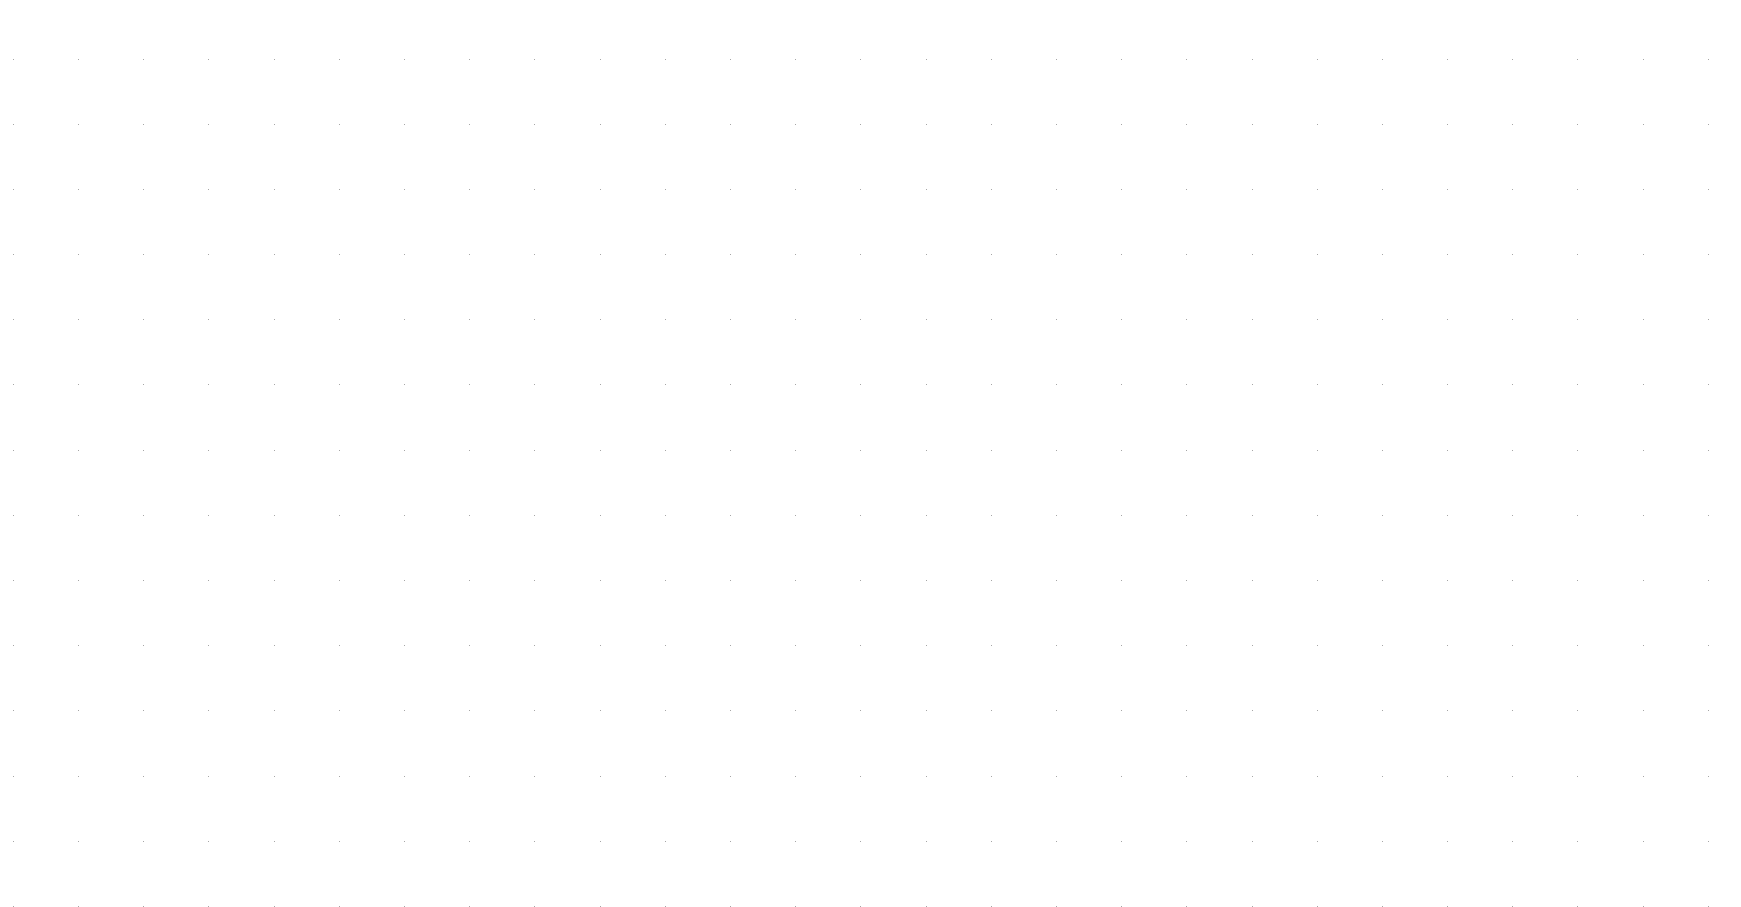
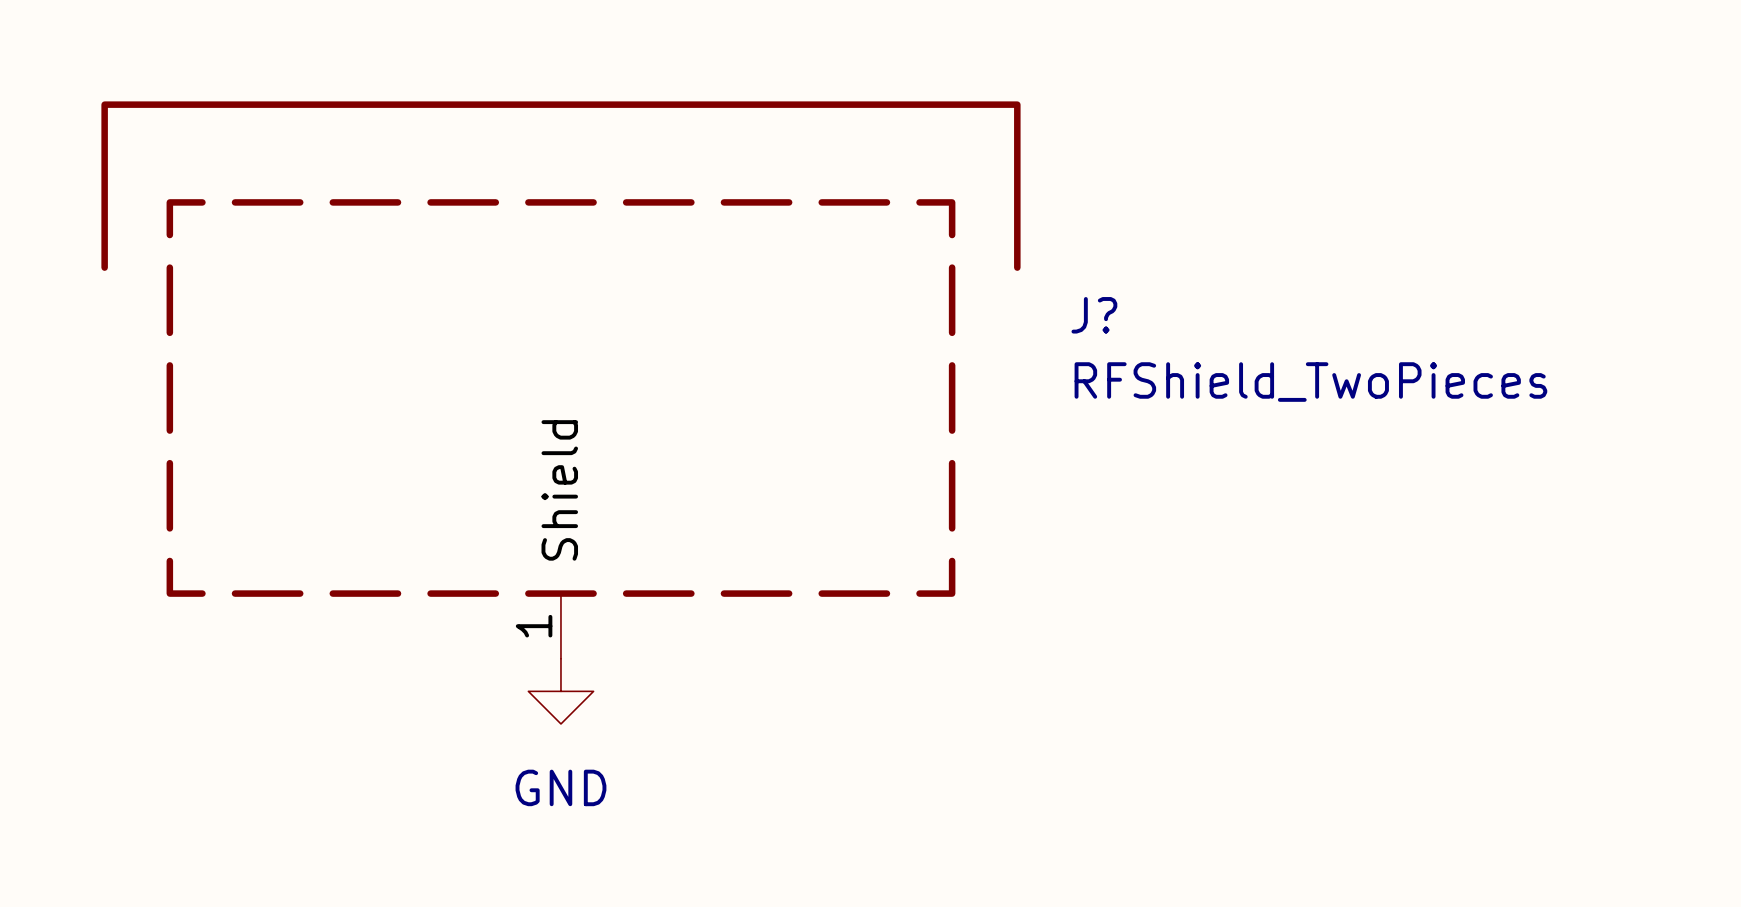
J?: none -> RFShield_TwoPieces (560, 380)
power symbol: none -> GND (560, 691)

